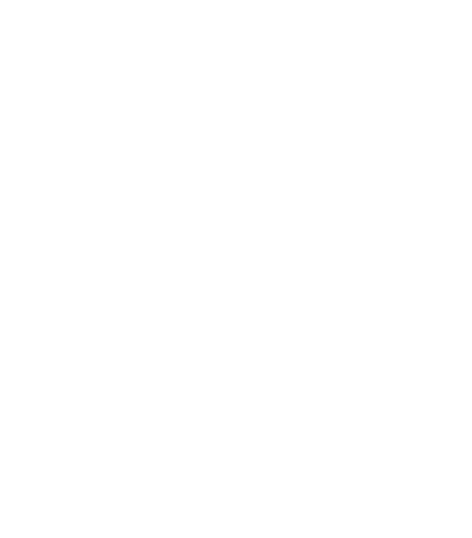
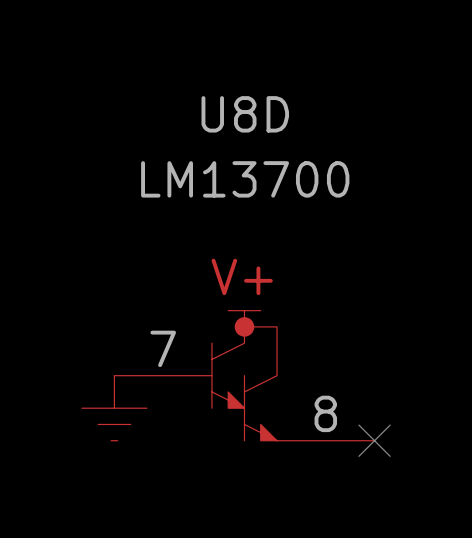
U8D: none -> LM13700 (244, 375)
power symbol: none -> (114, 408)
no-connect mark: none -> (374, 440)

